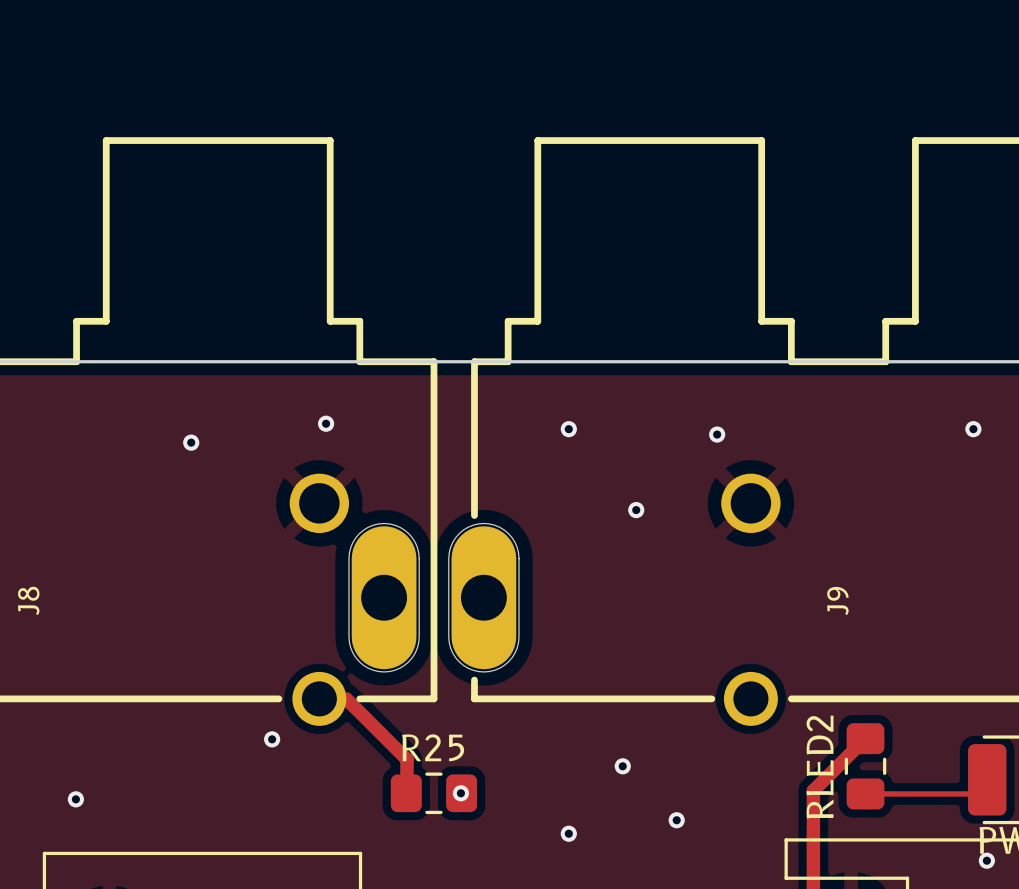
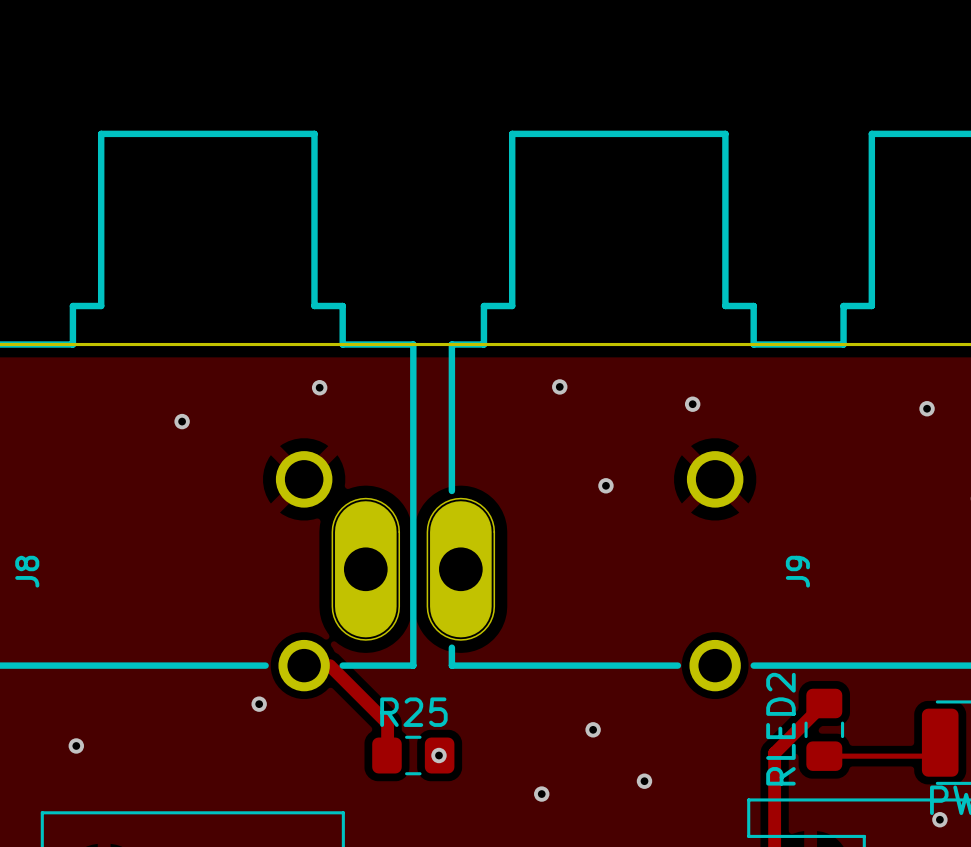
via position: (326, 423) -> (319, 387)
via position: (568, 429) -> (559, 386)
via position: (717, 434) -> (692, 404)
via position: (75, 799) -> (76, 745)

